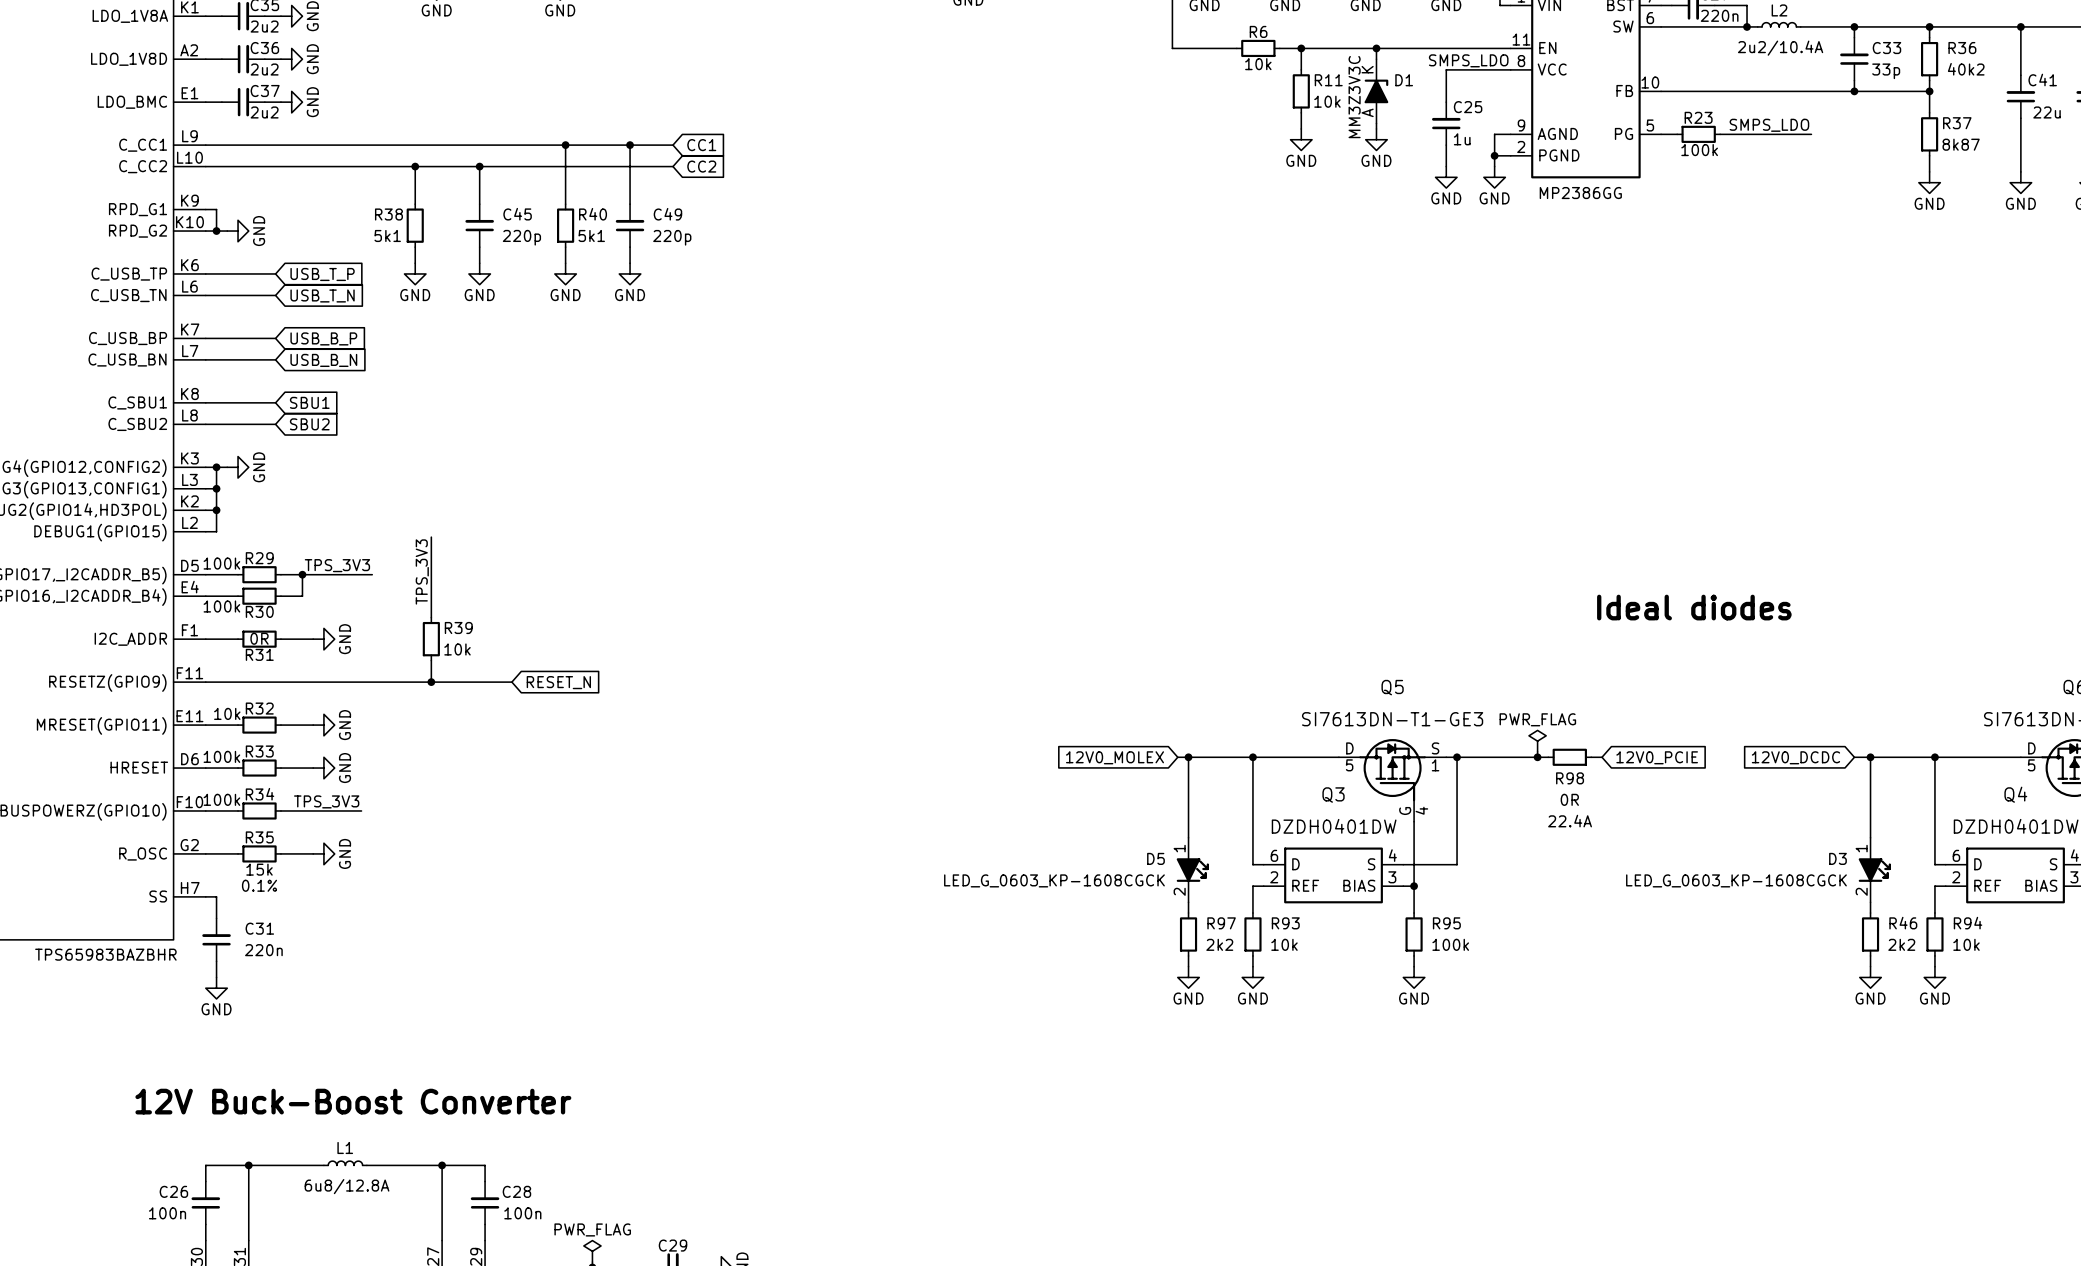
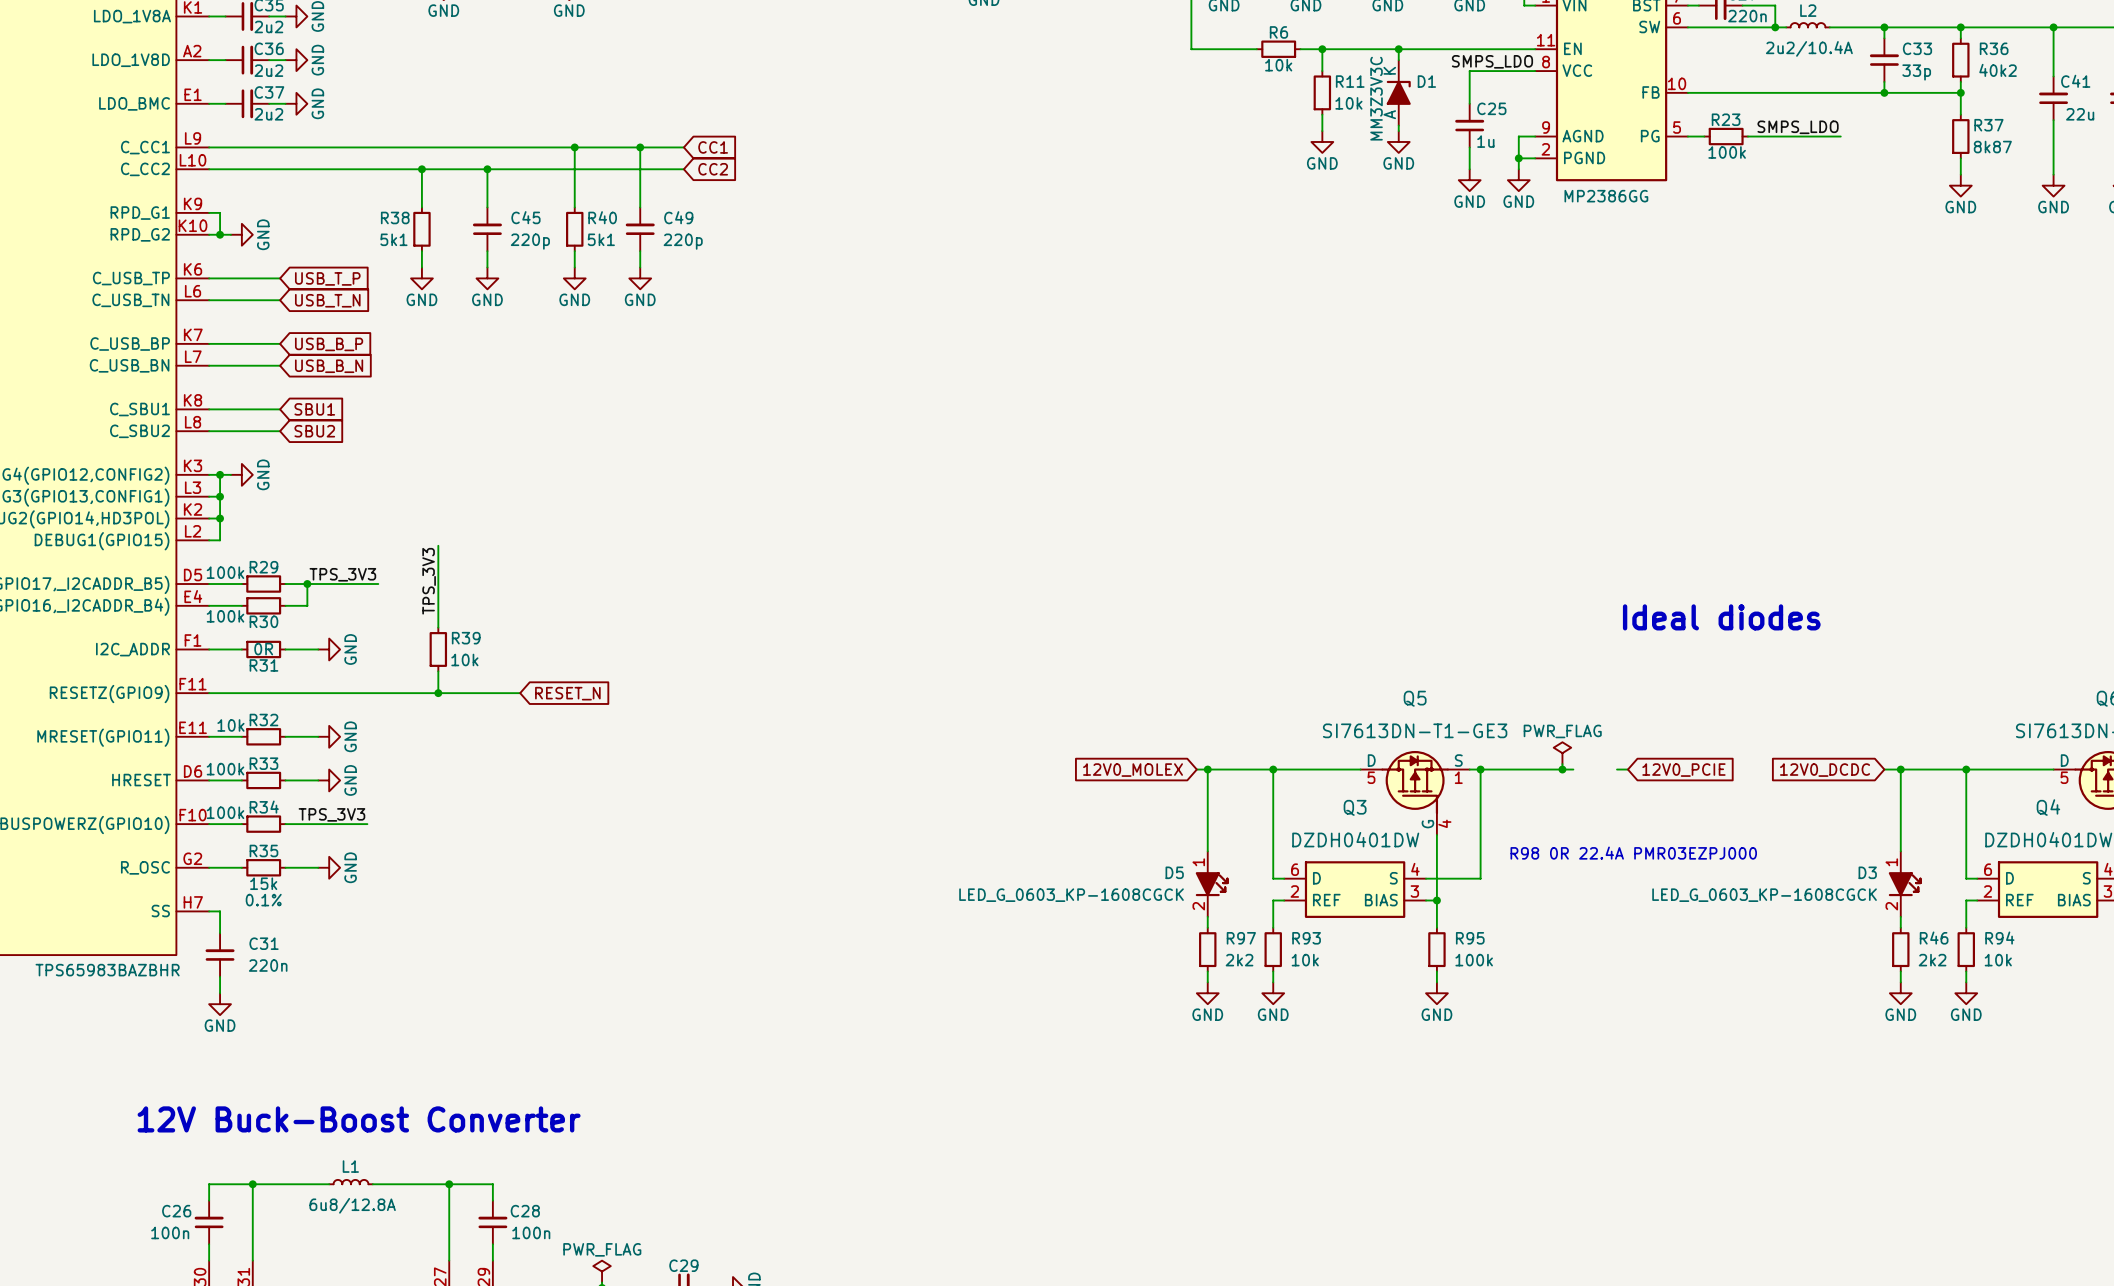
R98: (1569, 757) -> none
text: none -> R98 0R 22.4A PMR03EZPJ000 (1633, 853)

